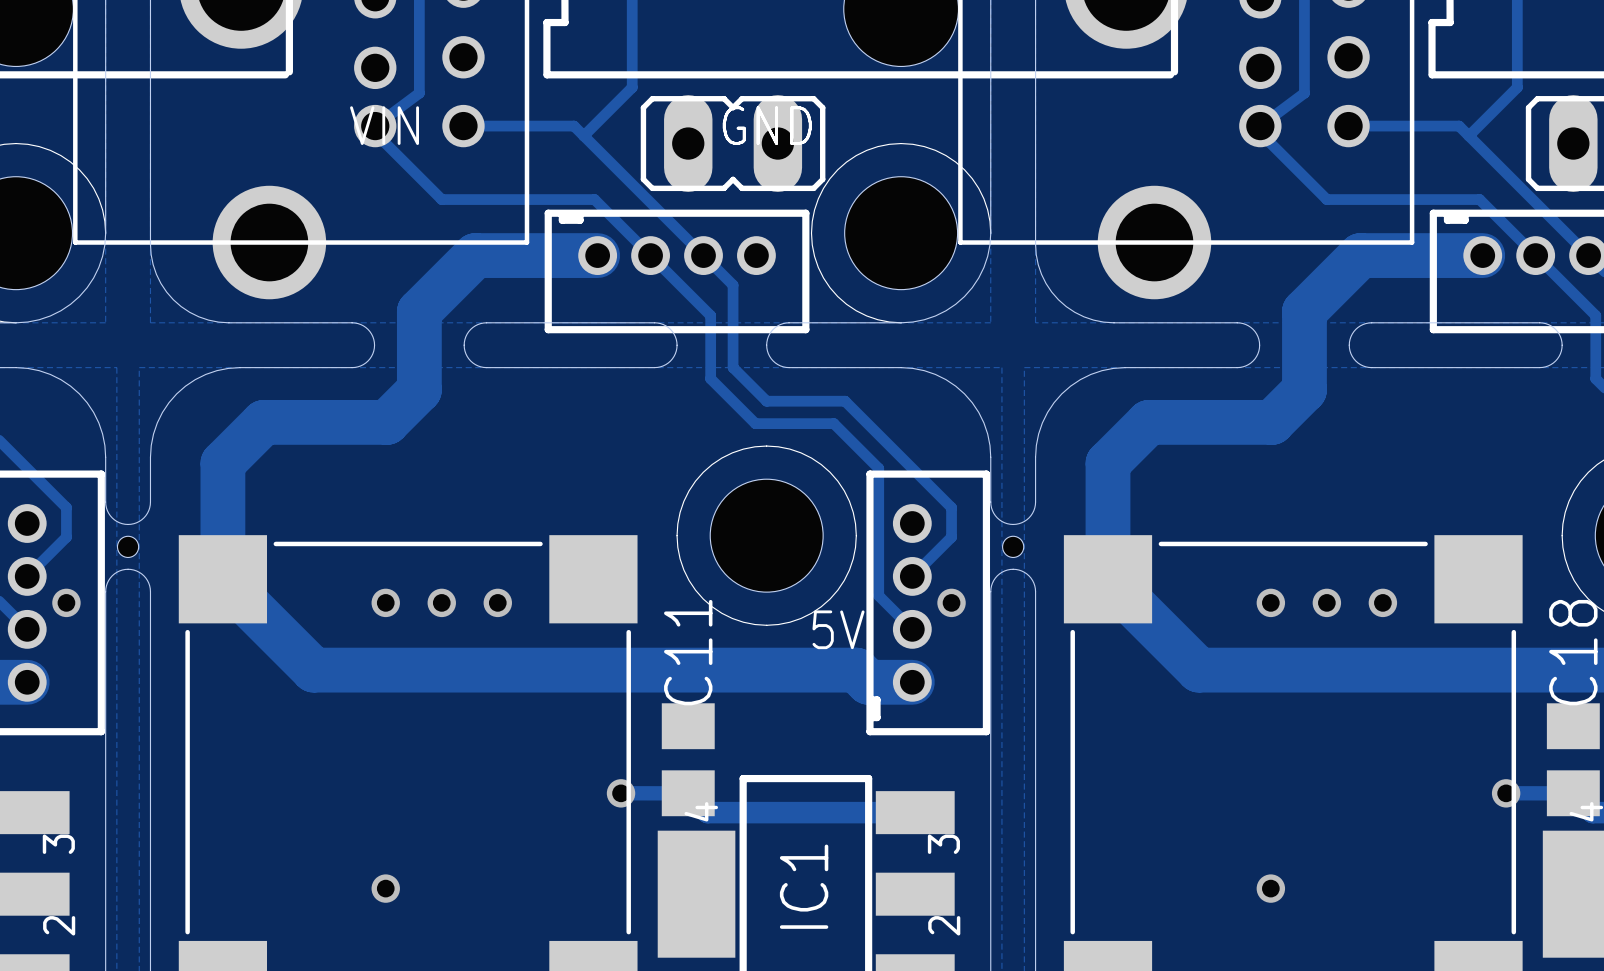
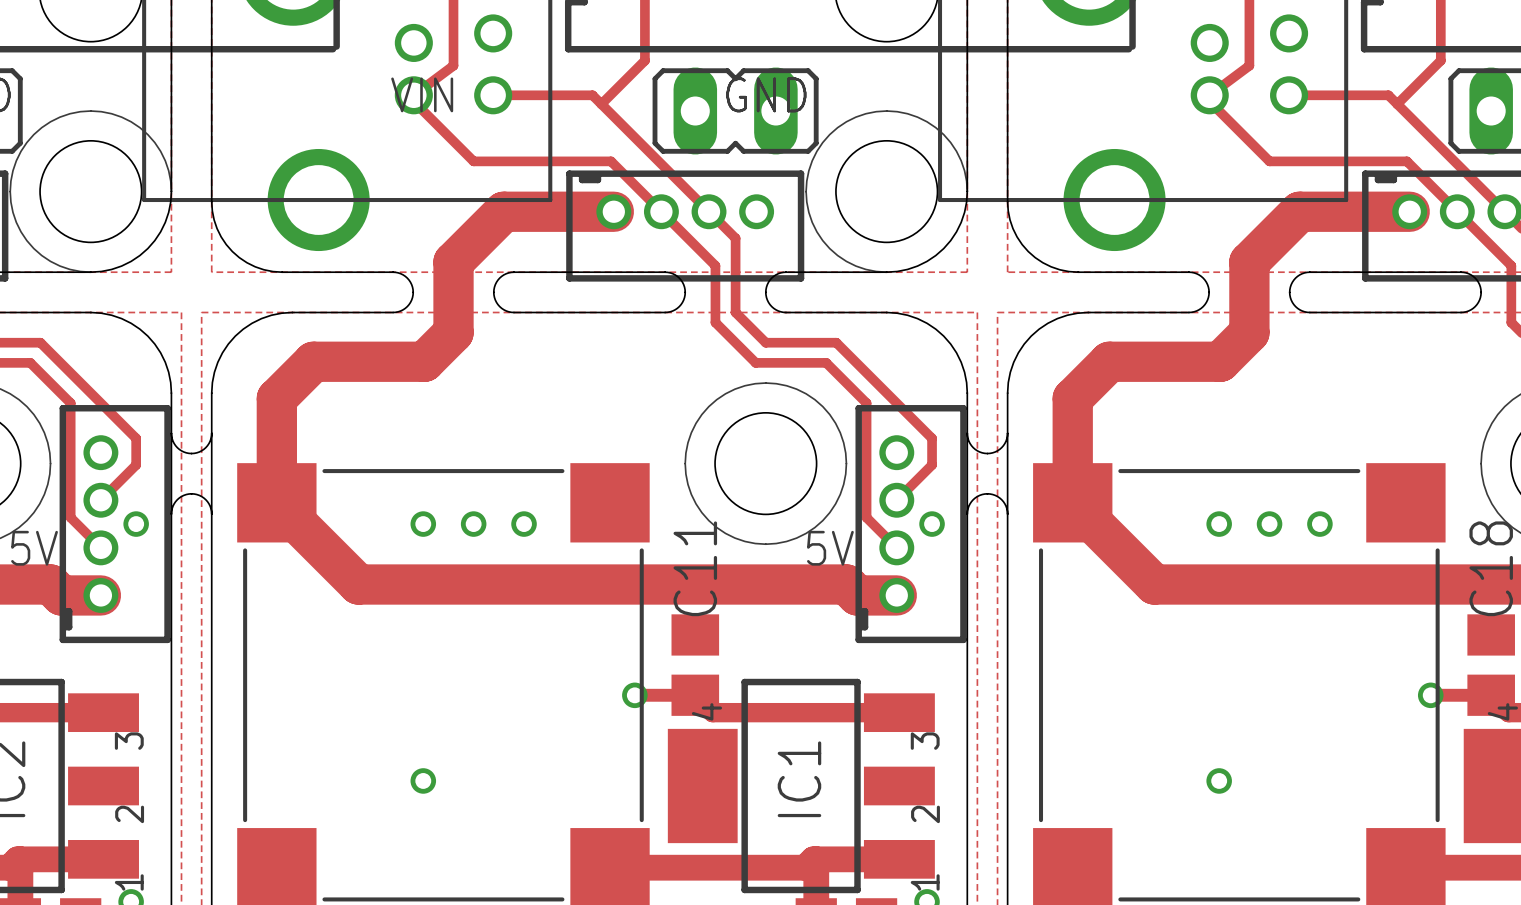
board edge: none -> (171, 433) (171, 513)
board edge: none -> (211, 433) (211, 513)
board edge: none -> (967, 433) (967, 513)
board edge: none -> (1007, 433) (1007, 513)
hole: (128, 546) -> none
hole: (1013, 546) -> none

